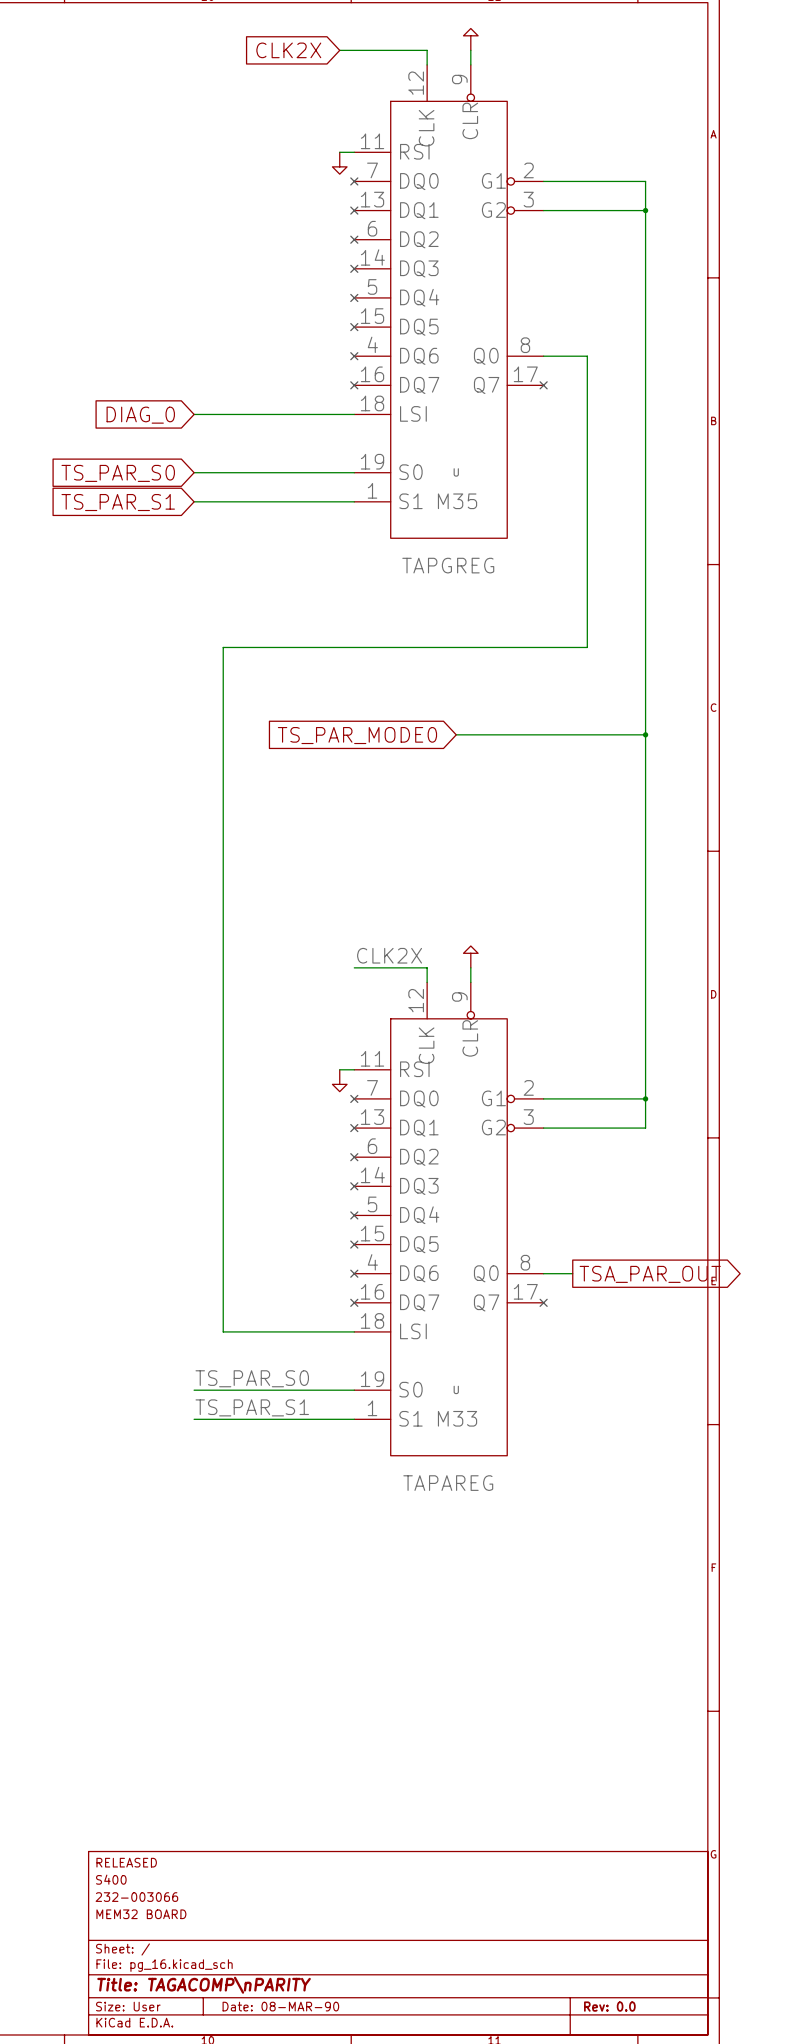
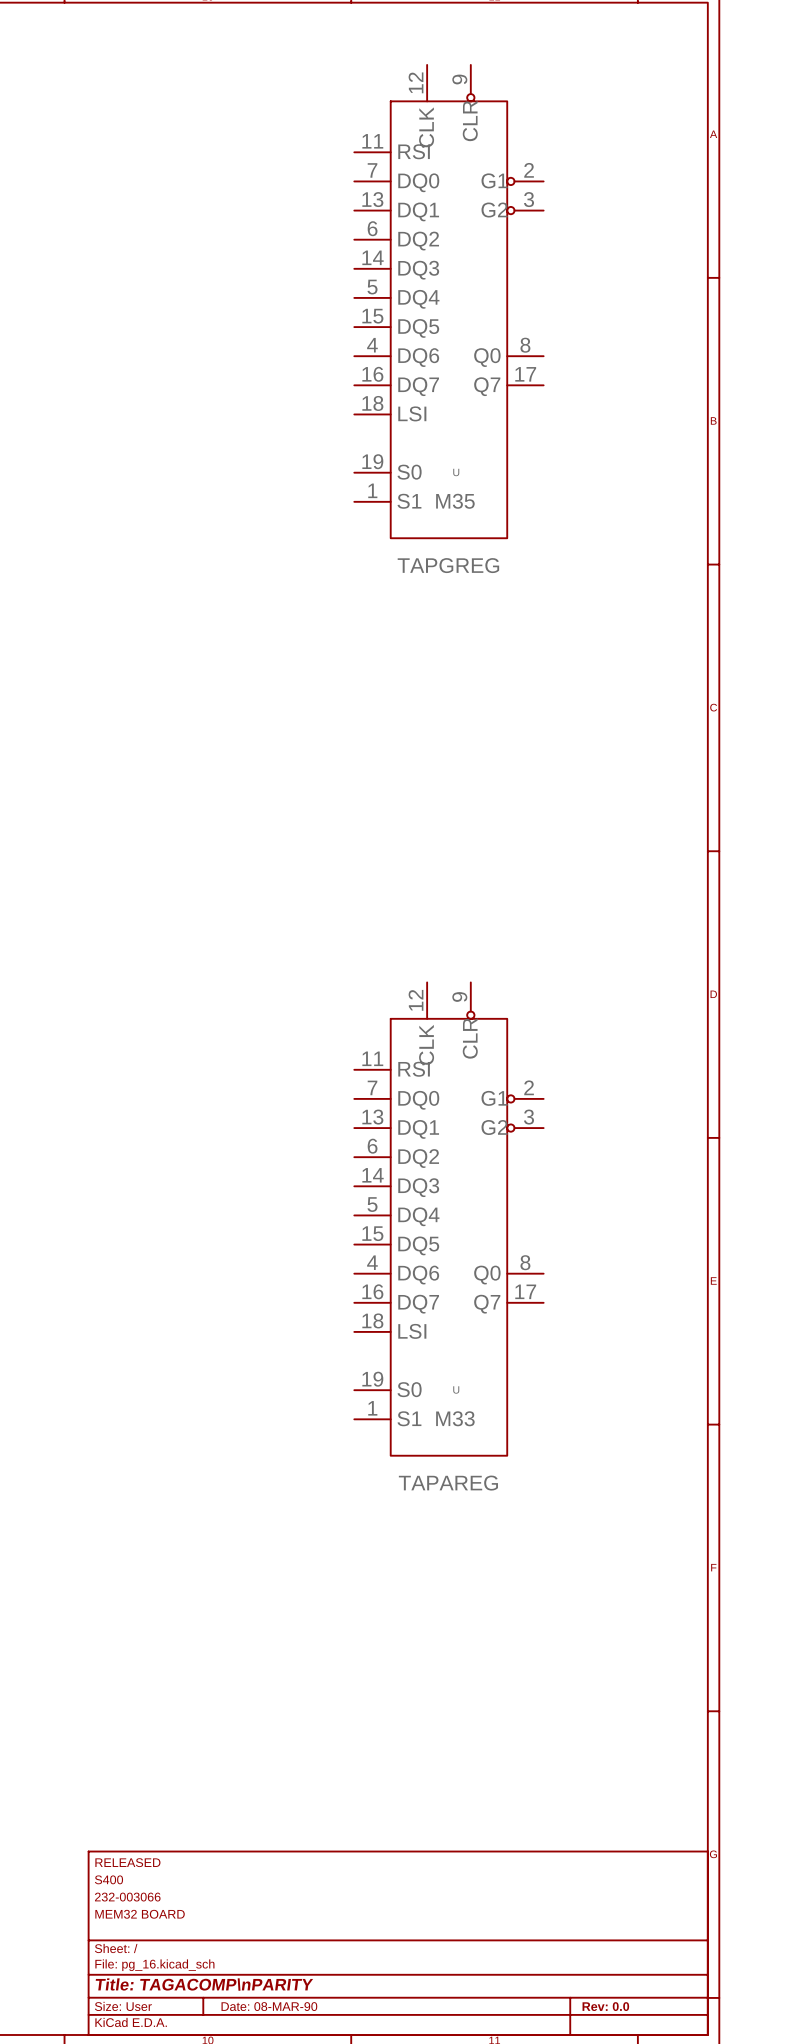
power symbol: (470, 39) -> none
global label: CLK2X (288, 50) -> none
wire: (339, 50) (427, 50) (427, 64) -> none
wire: (470, 50) (470, 64) -> none
wire: (339, 152) (354, 152) -> none
power symbol: (339, 163) -> none
no-connect mark: (354, 181) -> none
wire: (543, 181) (645, 181) (645, 1128) (543, 1128) -> none
no-connect mark: (354, 210) -> none
wire: (543, 210) (645, 210) -> none
junction: (645, 210) -> none
no-connect mark: (354, 239) -> none
no-connect mark: (354, 268) -> none
no-connect mark: (354, 297) -> none
no-connect mark: (354, 327) -> none
no-connect mark: (354, 356) -> none
wire: (543, 356) (587, 356) (587, 647) (223, 647) (223, 1331) (354, 1331) -> none
no-connect mark: (354, 385) -> none
no-connect mark: (543, 385) -> none
wire: (194, 414) (354, 414) -> none
global label: DIAG_0 (140, 415) -> none
wire: (194, 472) (354, 472) -> none
global label: TS_PAR_S0 (118, 473) -> none
wire: (194, 501) (354, 501) -> none
global label: TS_PAR_S1 (118, 502) -> none
wire: (456, 734) (645, 734) -> none
junction: (645, 734) -> none
global label: TS_PAR_MODE0 (357, 735) -> none
label: CLK2X (389, 955) -> none
power symbol: (470, 956) -> none
wire: (354, 967) (427, 967) (427, 982) -> none
wire: (470, 967) (470, 982) -> none
wire: (339, 1069) (354, 1069) -> none
power symbol: (339, 1080) -> none
no-connect mark: (354, 1098) -> none
wire: (543, 1098) (645, 1098) -> none
junction: (645, 1098) -> none
no-connect mark: (354, 1128) -> none
no-connect mark: (354, 1157) -> none
no-connect mark: (354, 1186) -> none
no-connect mark: (354, 1215) -> none
no-connect mark: (354, 1244) -> none
no-connect mark: (354, 1273) -> none
wire: (543, 1273) (572, 1273) -> none
global label: TSA_PAR_OUT (650, 1274) -> none
no-connect mark: (354, 1302) -> none
no-connect mark: (543, 1302) -> none
label: TS_PAR_S0 (252, 1378) -> none
wire: (194, 1390) (354, 1390) -> none
label: TS_PAR_S1 (252, 1407) -> none
wire: (194, 1419) (354, 1419) -> none

